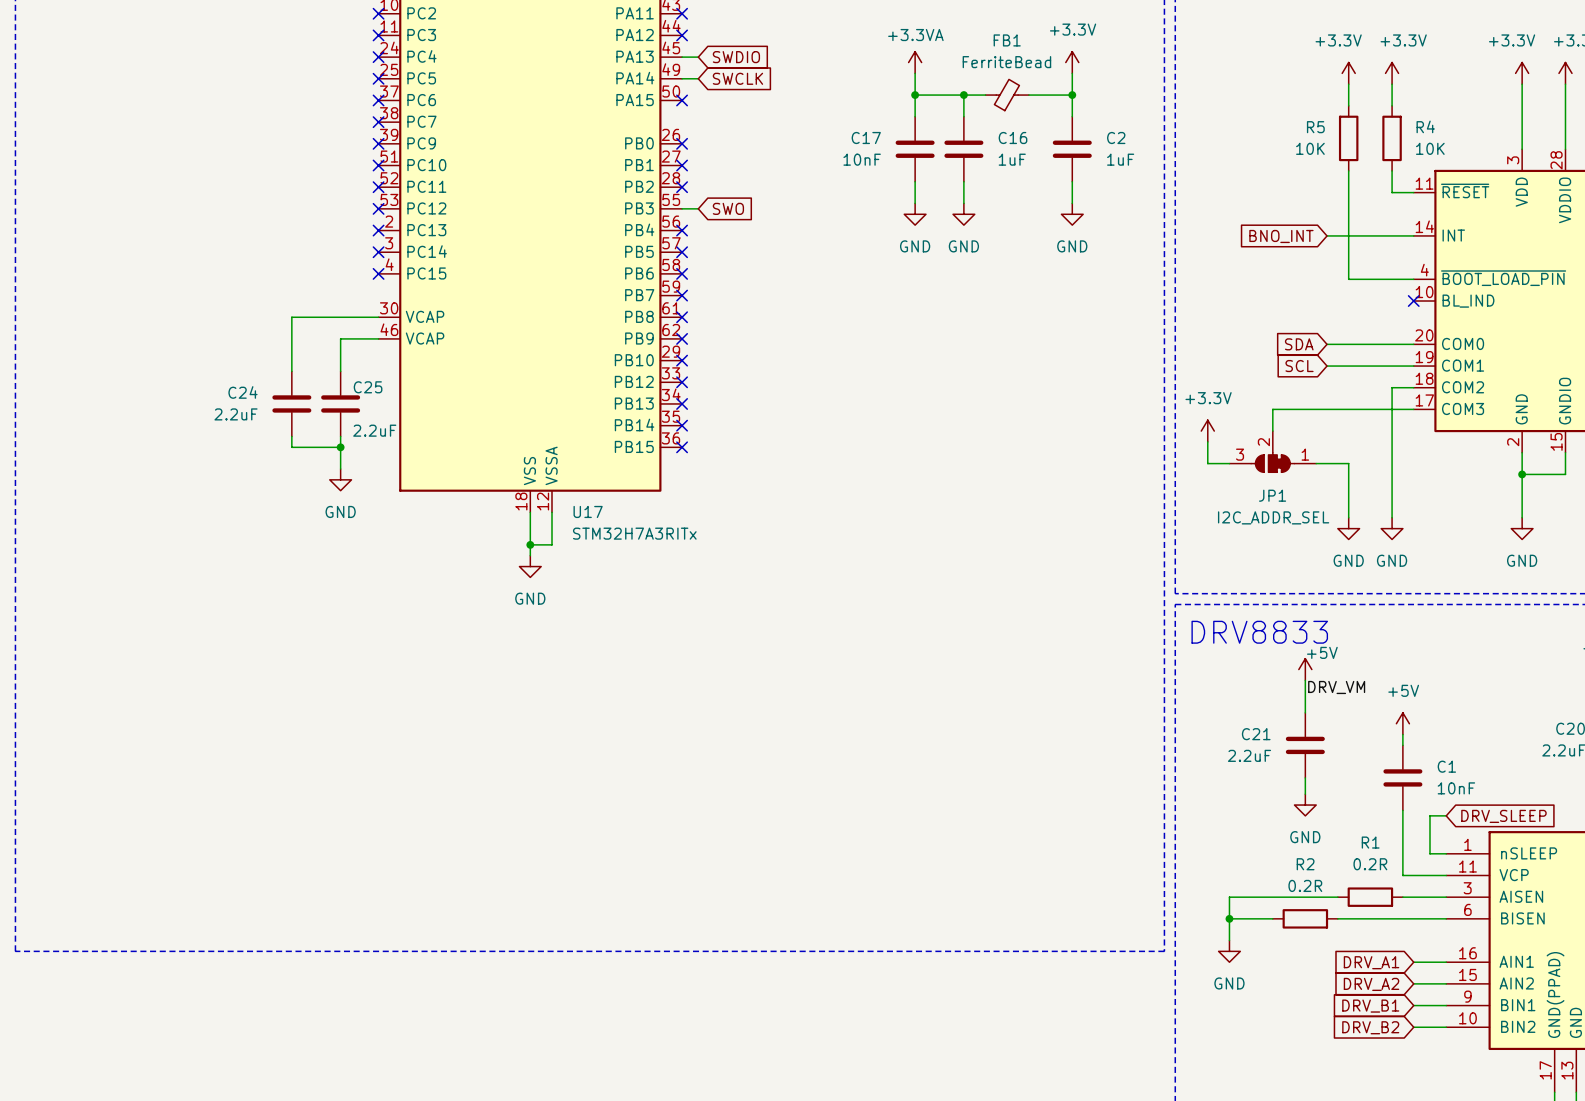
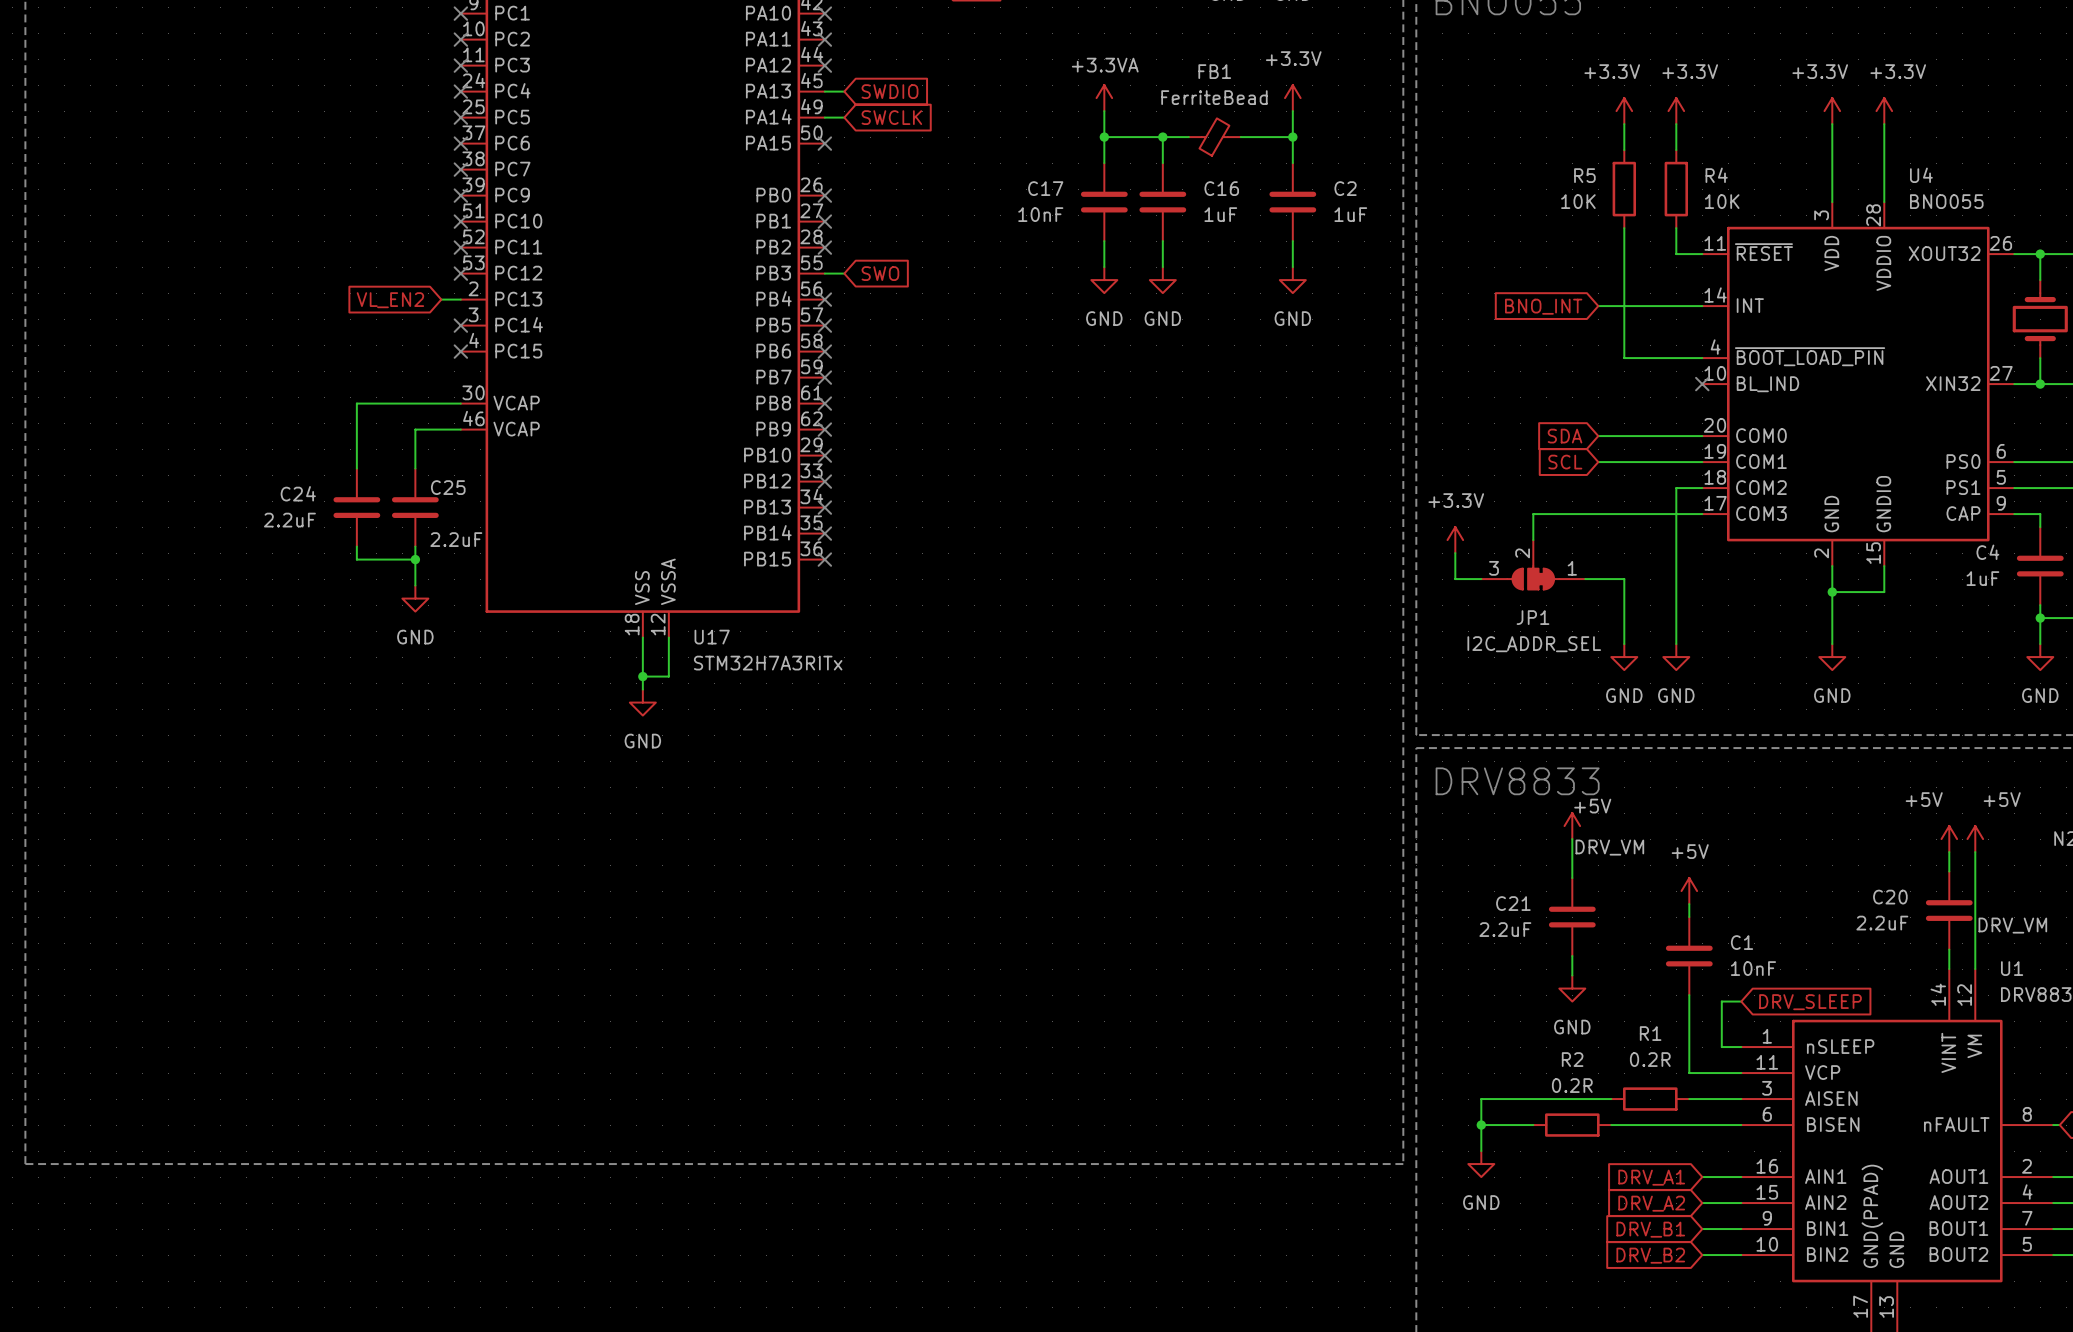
wire: none -> (441, 299) (460, 299)
no-connect mark: (378, 230) -> none
global label: none -> VL_EN2 (390, 300)

